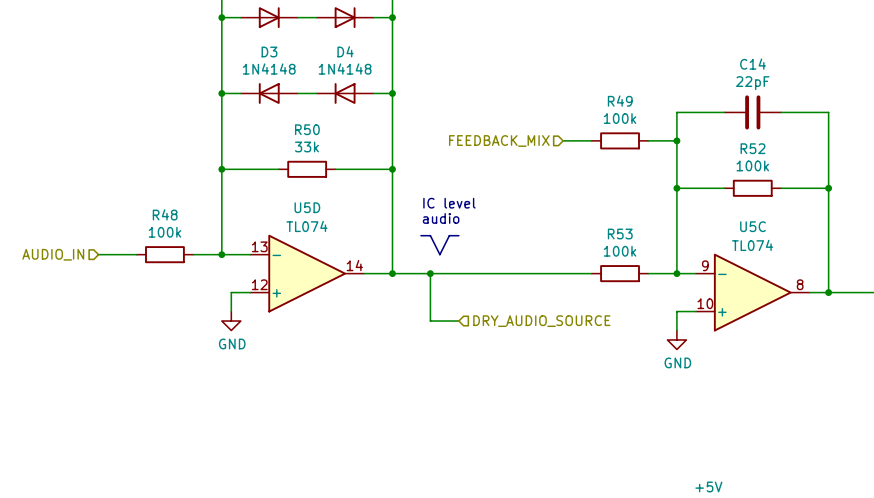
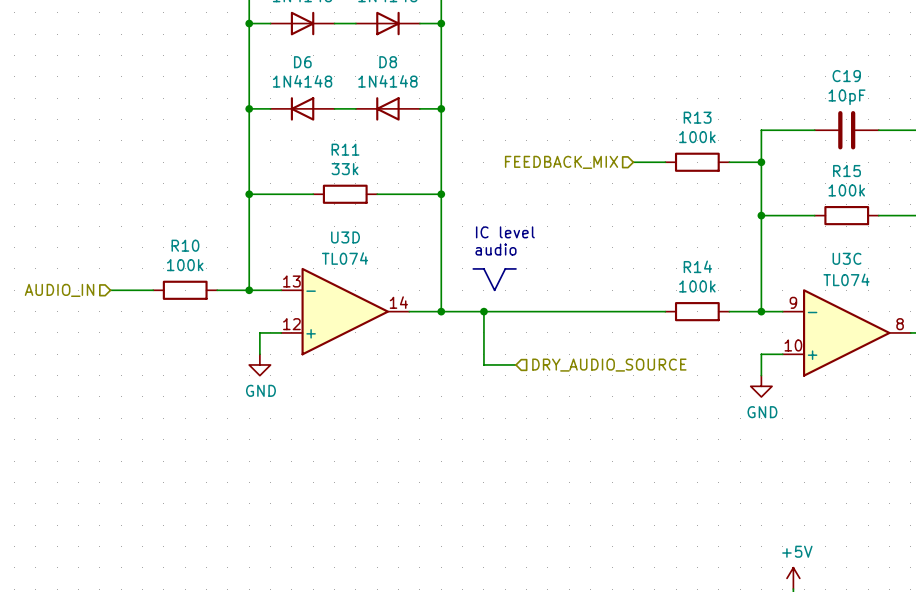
D3 name: D3 (269, 51) -> D6 (302, 62)
D4 name: D4 (345, 51) -> D8 (388, 62)
C14 name: C14 (752, 64) -> C19 (846, 76)
C14 value: 22pF (752, 83) -> 10pF (847, 97)
R49 name: R49 (620, 101) -> R13 (697, 117)
R50 name: R50 (307, 129) -> R11 (345, 149)
R52 name: R52 (752, 148) -> R15 (847, 171)
U5D name: U5D (307, 207) -> U3D (345, 237)
R48 name: R48 (165, 214) -> R10 (185, 245)
U5C name: U5C (752, 226) -> U3C (847, 258)
R53 name: R53 (620, 234) -> R14 (697, 266)

